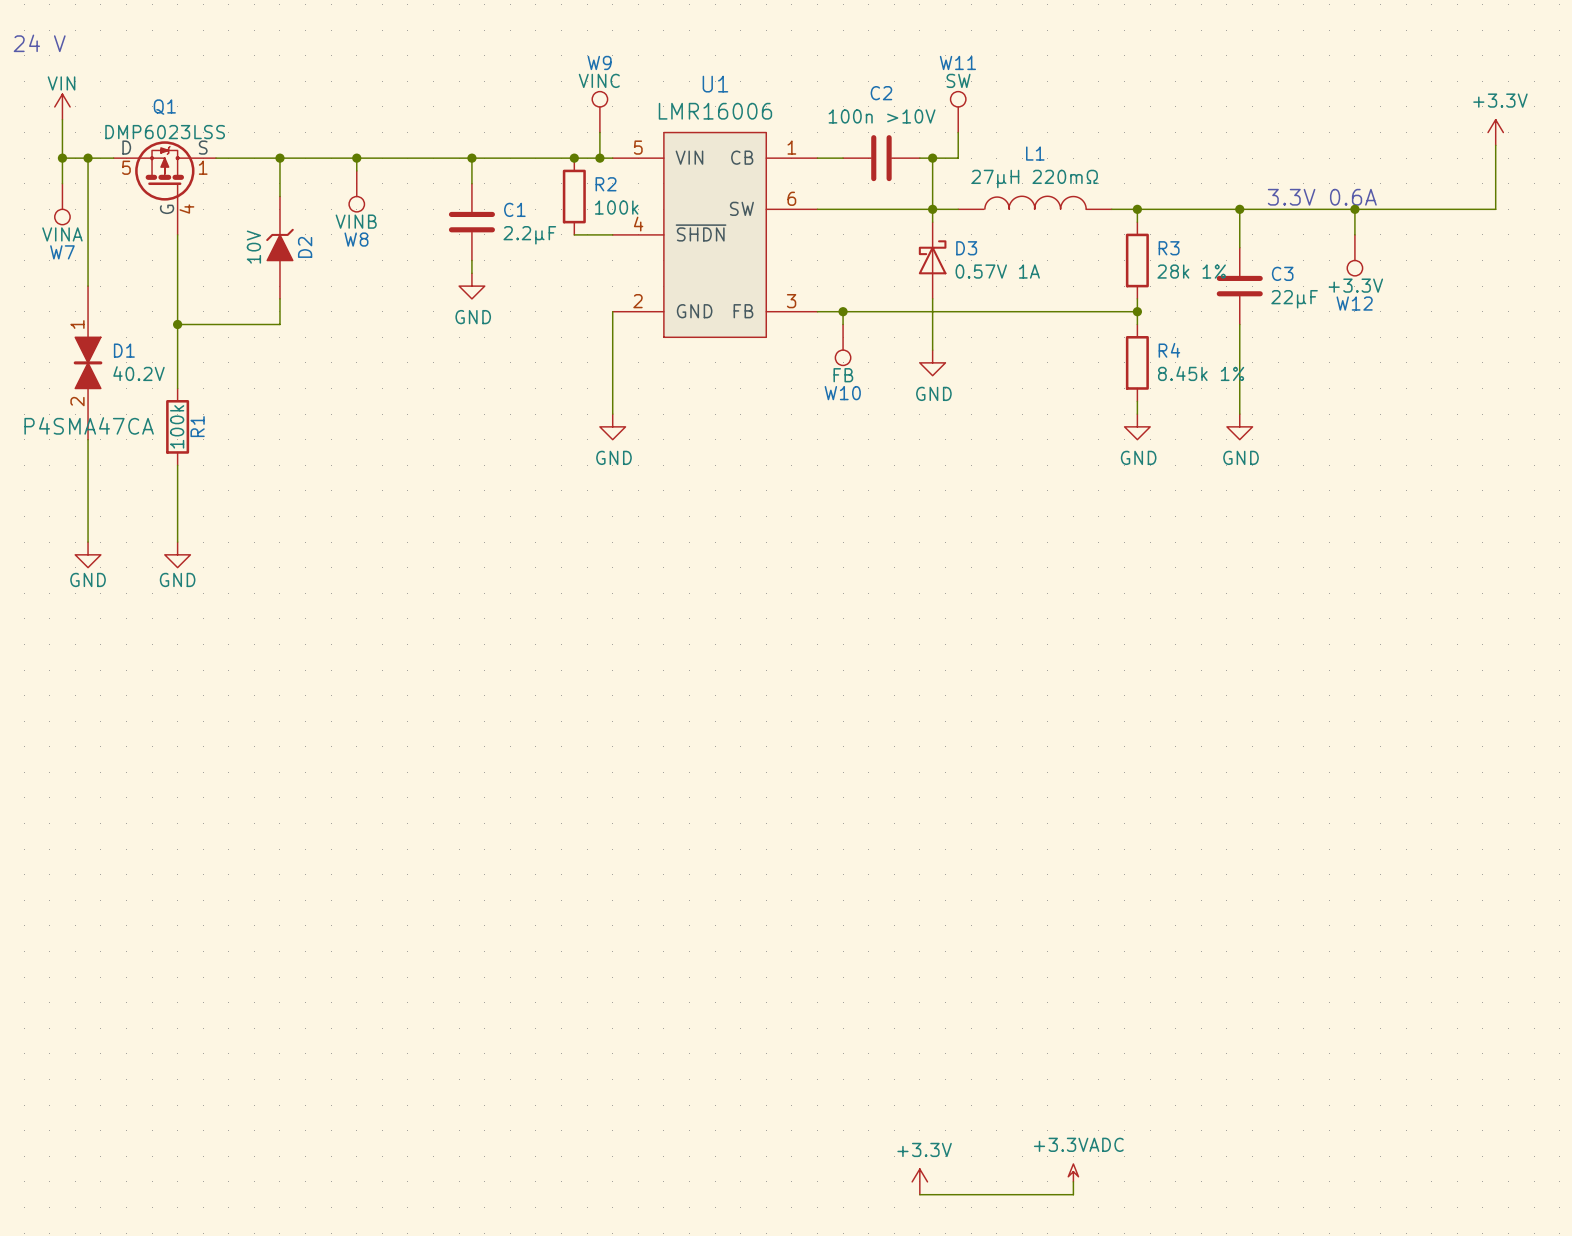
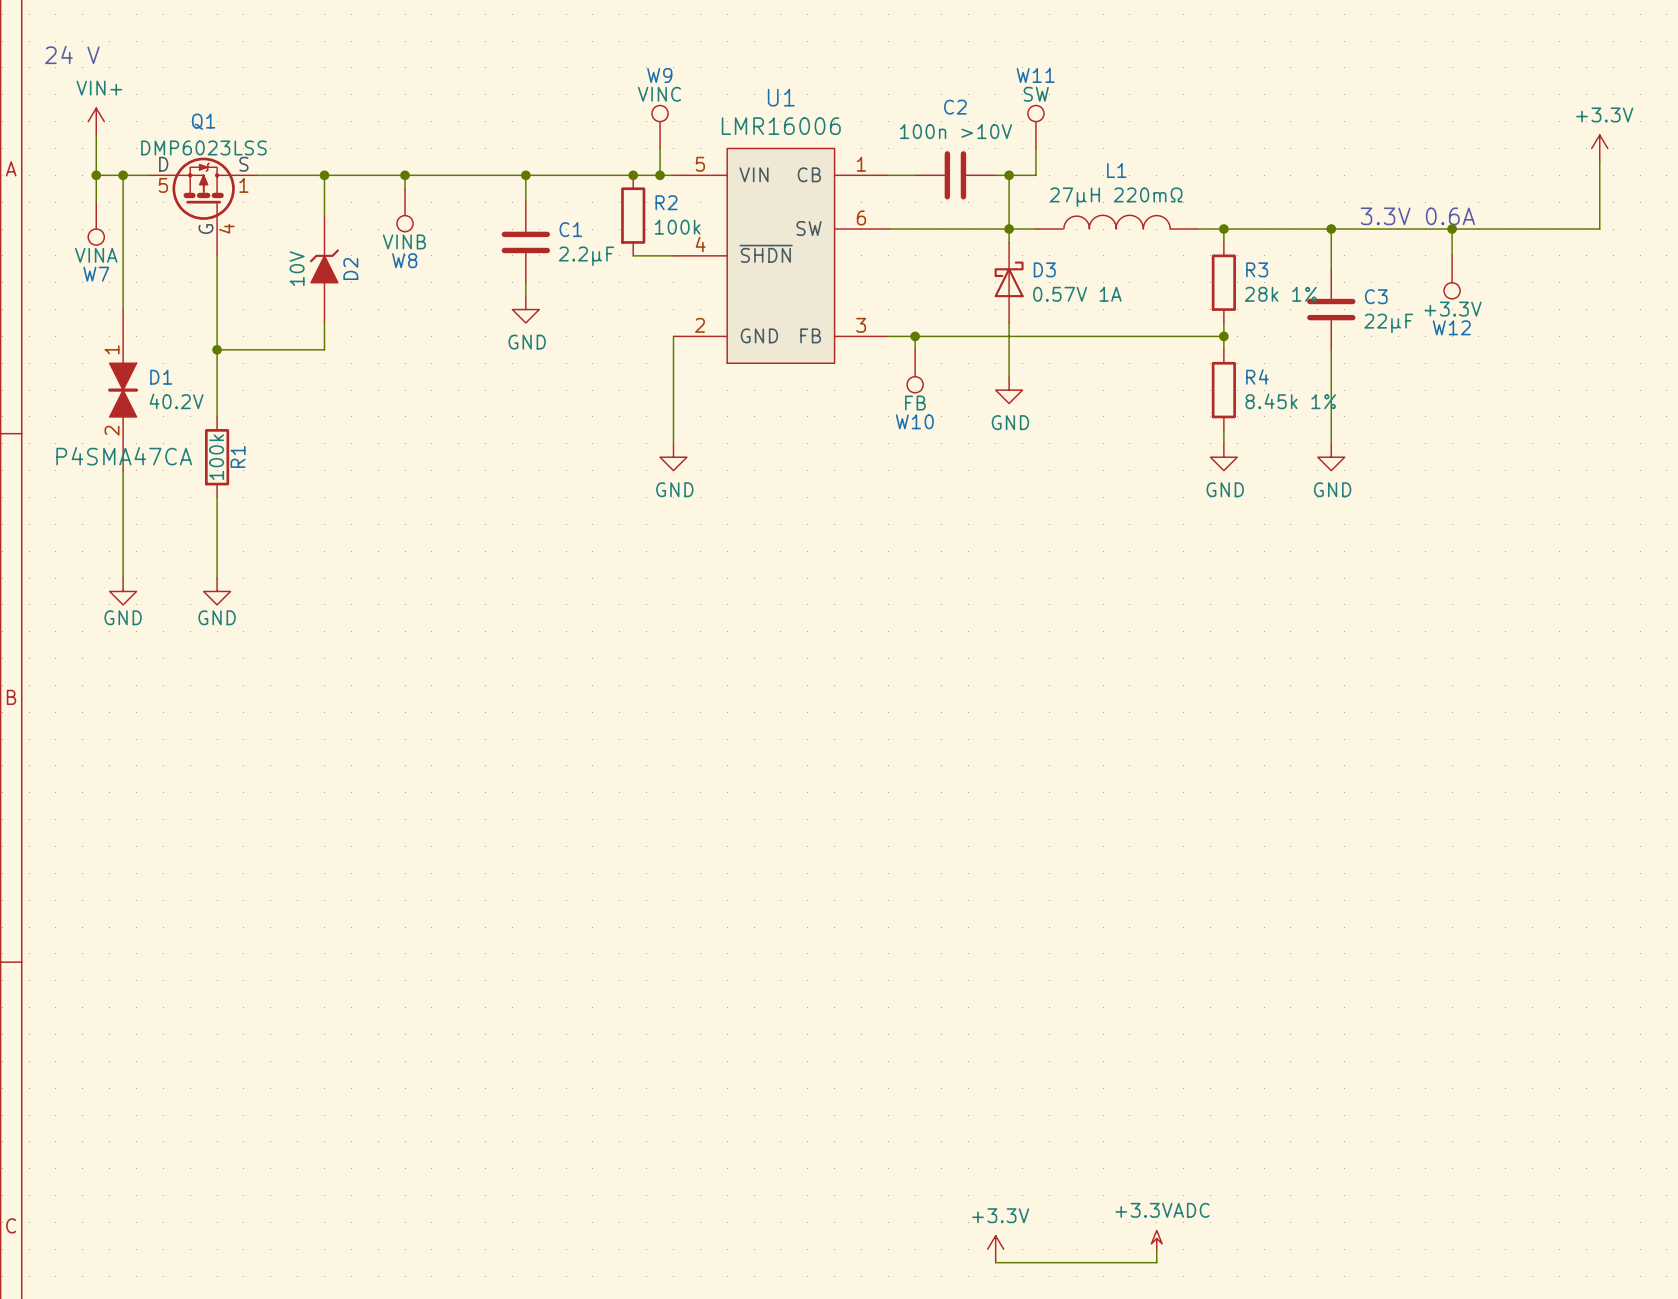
power symbol: VIN (62, 106) -> VIN+ (96, 121)

